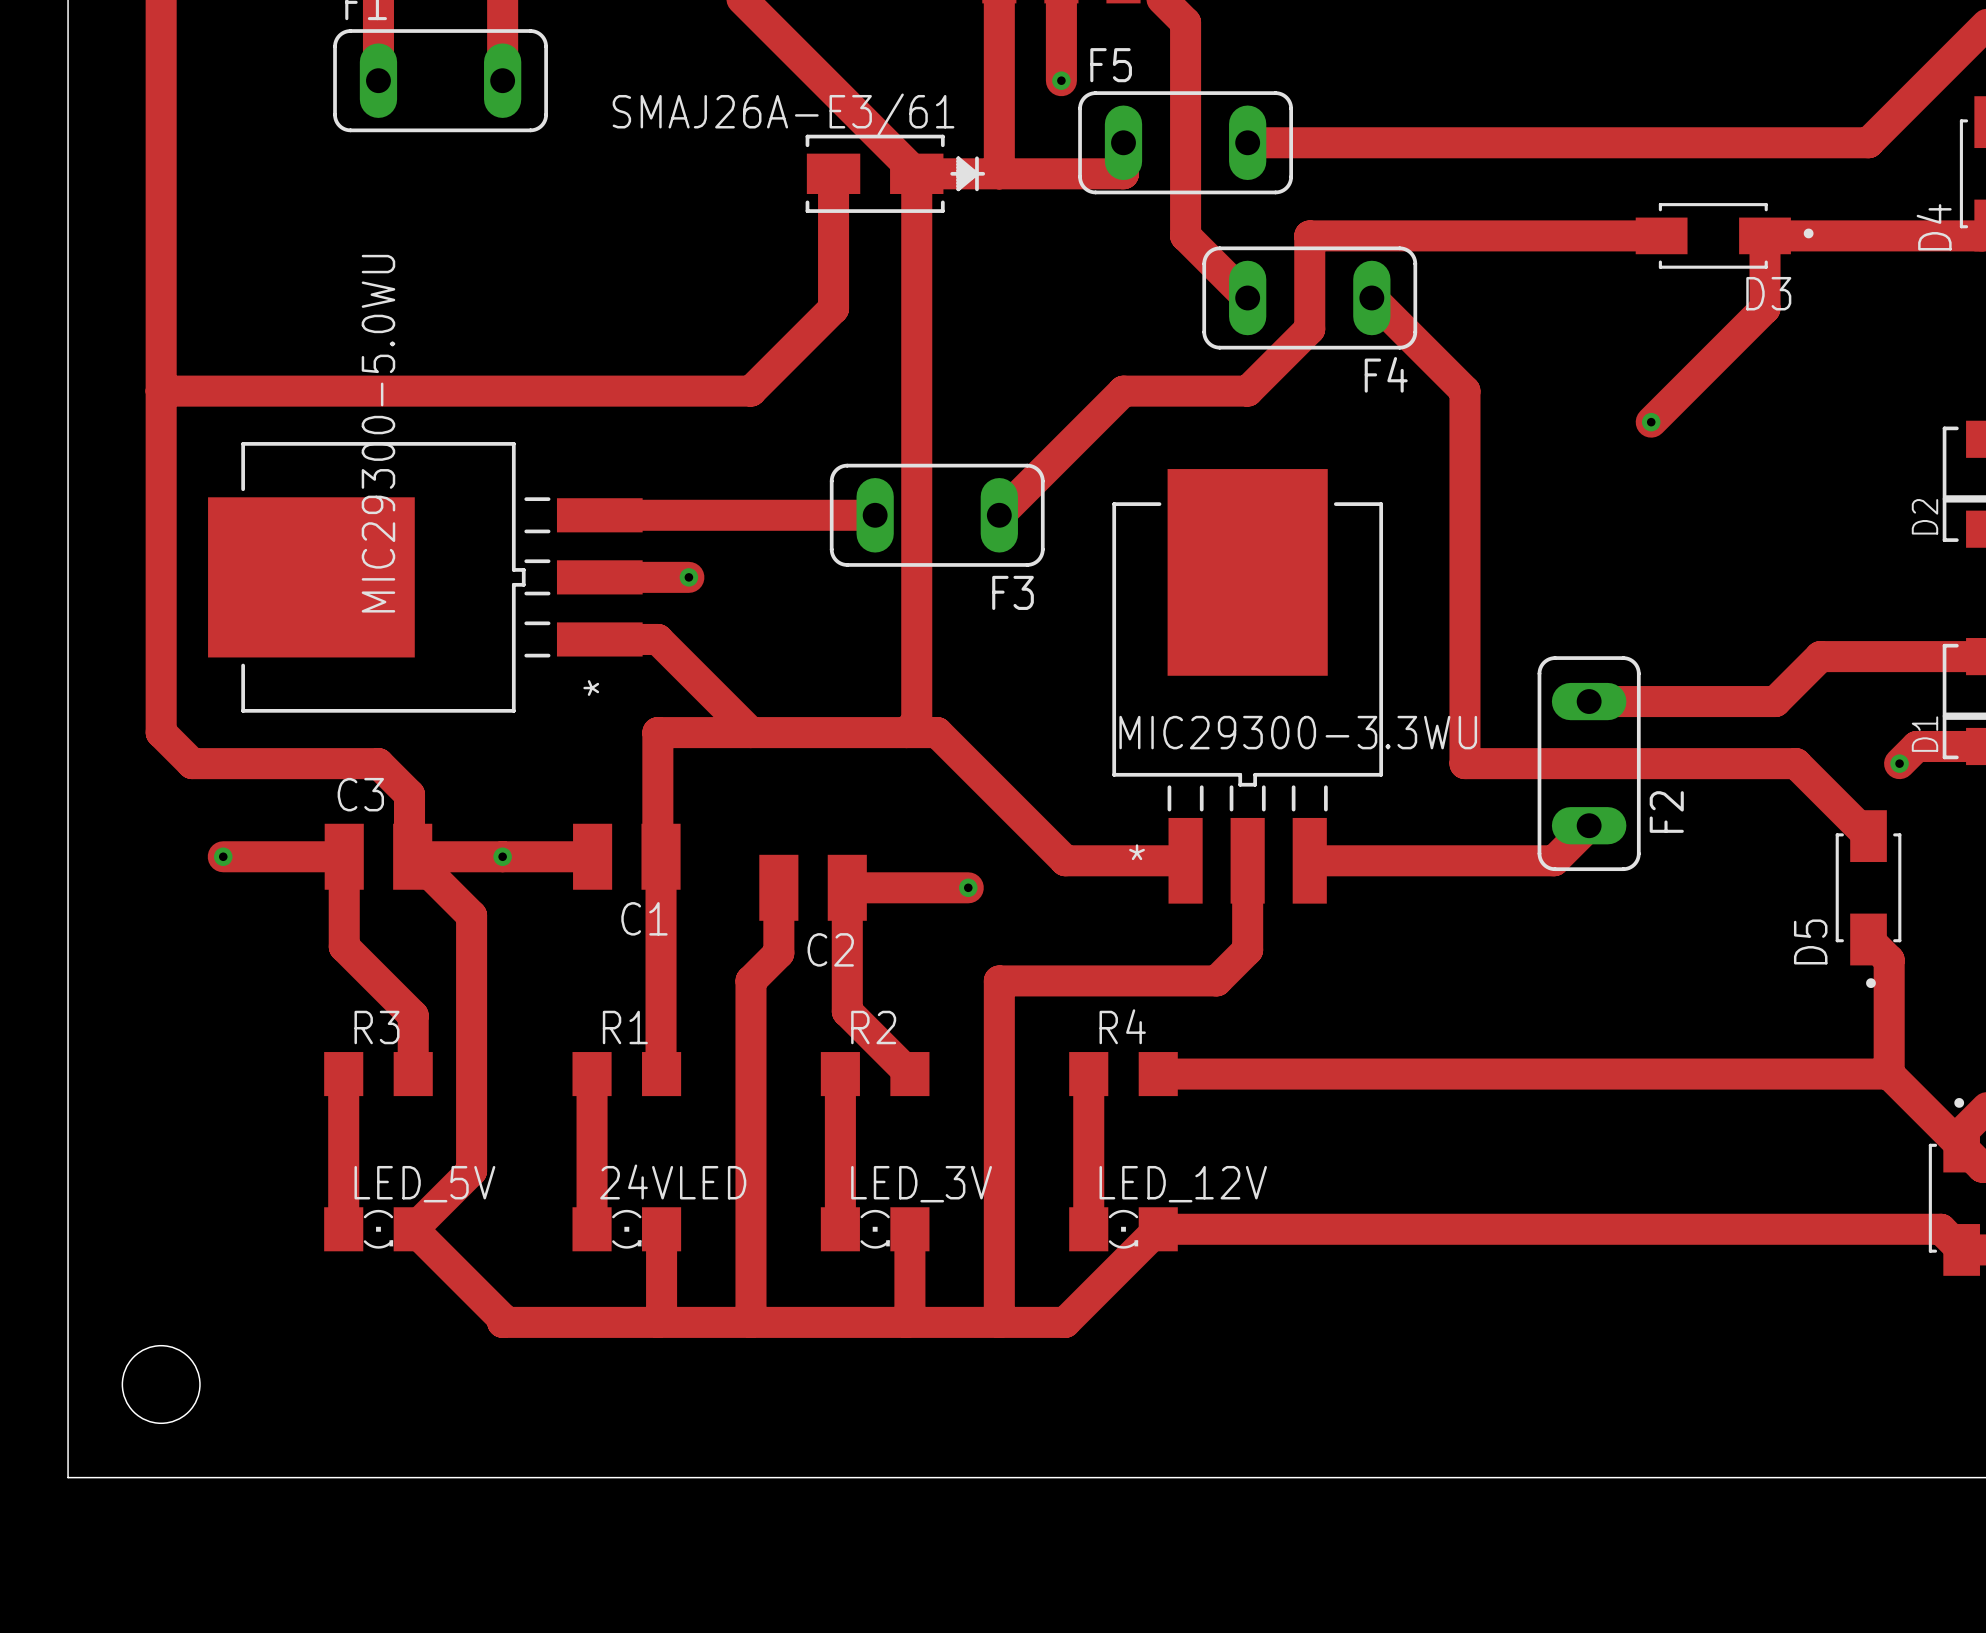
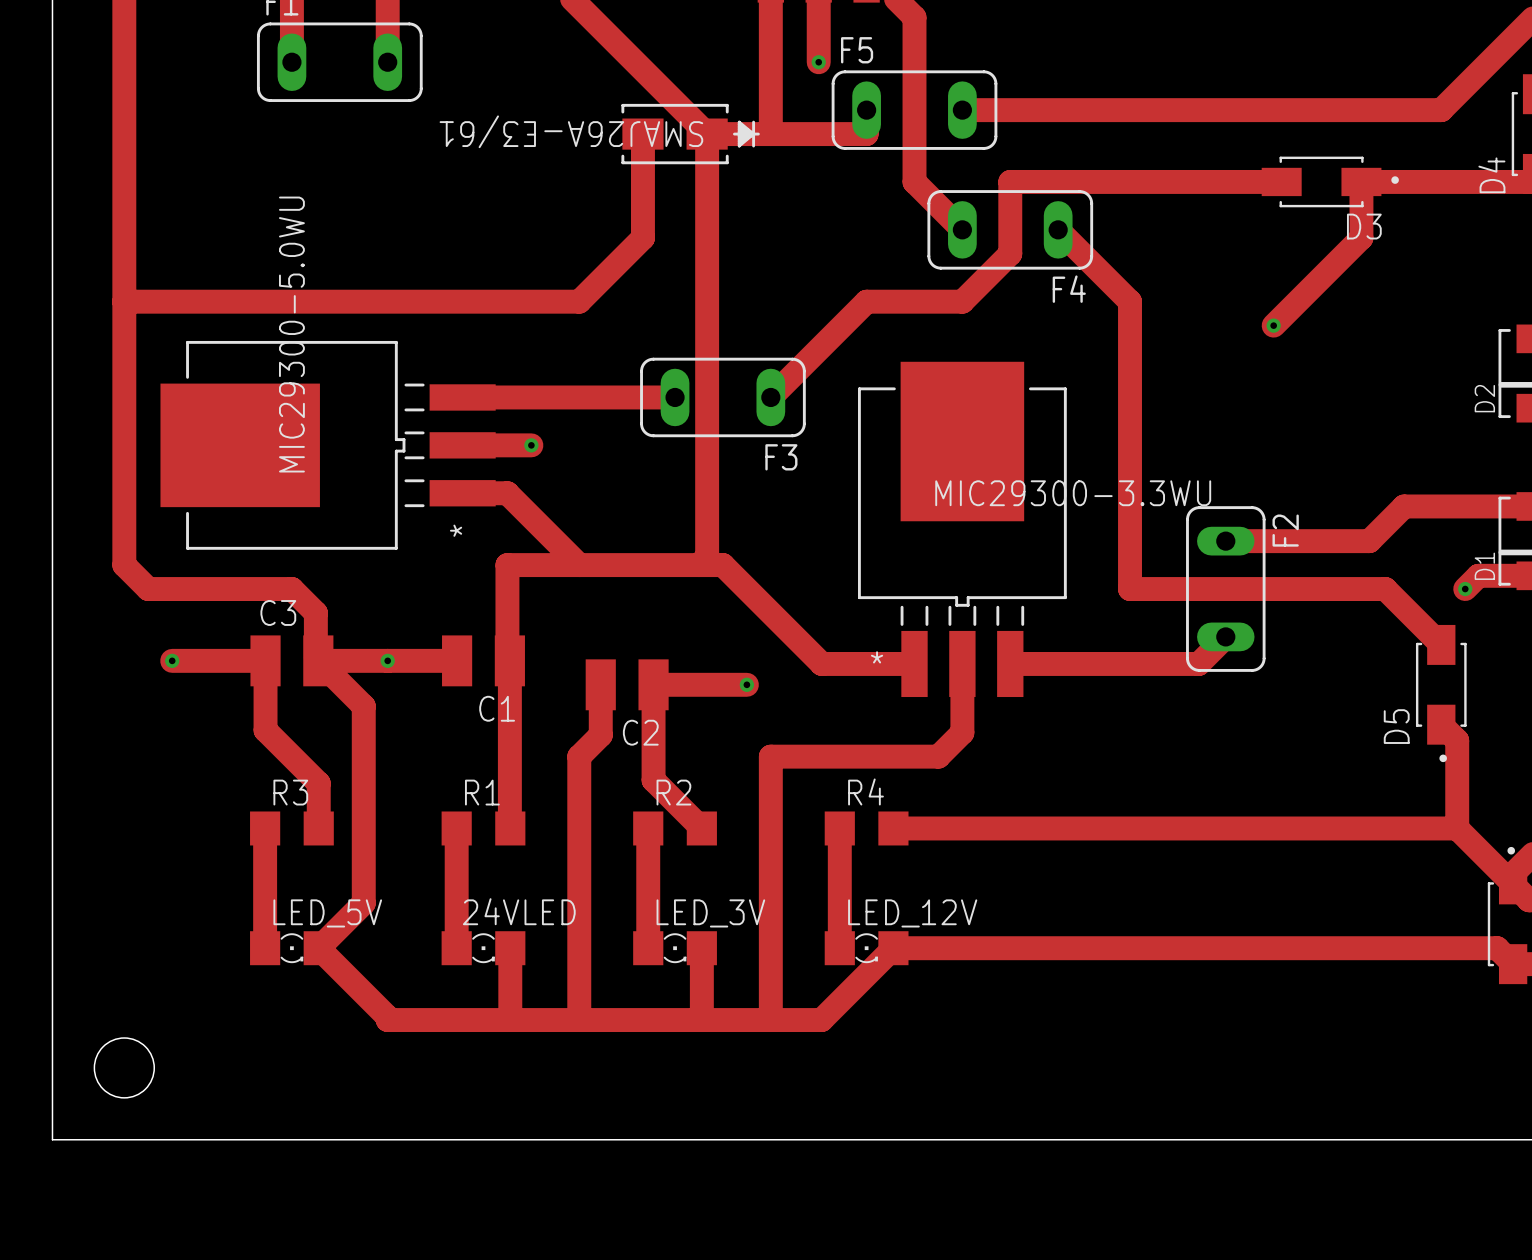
part value rotation: 0° (783, 114) -> 180° (571, 131)
part value position: MIC29300-3.3WU (1298, 732) -> MIC29300-3.3WU (1073, 493)
F2 name position: F2 (1666, 812) -> F2 (1285, 530)

